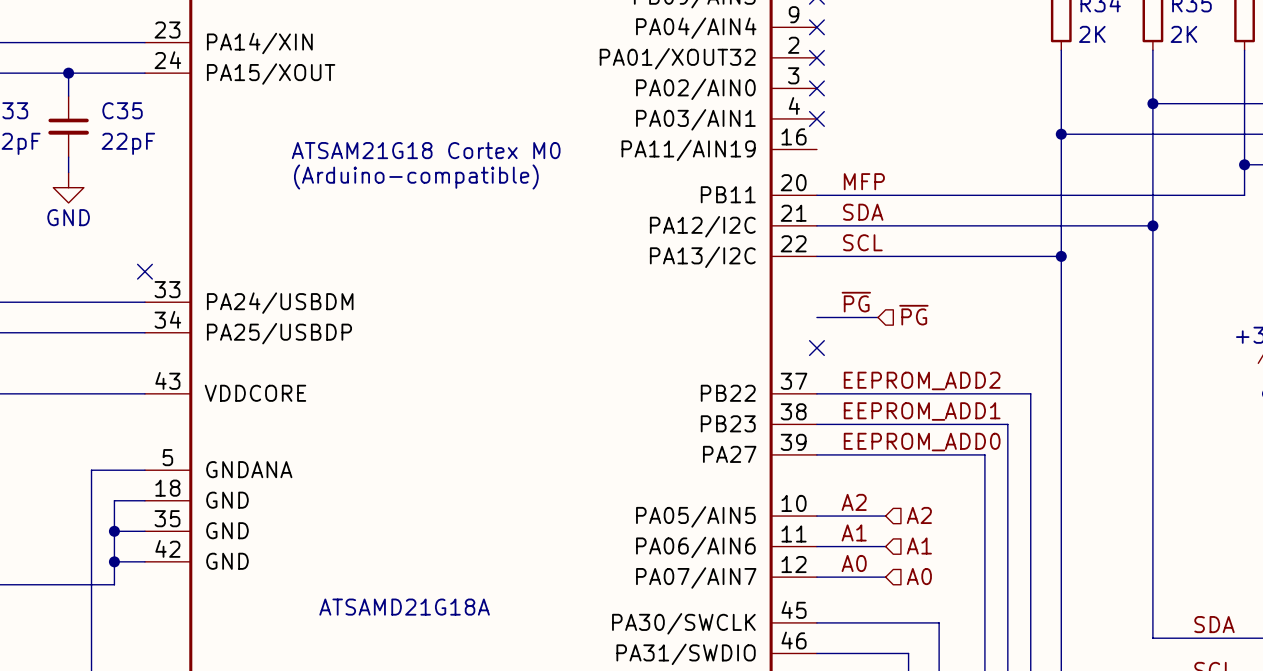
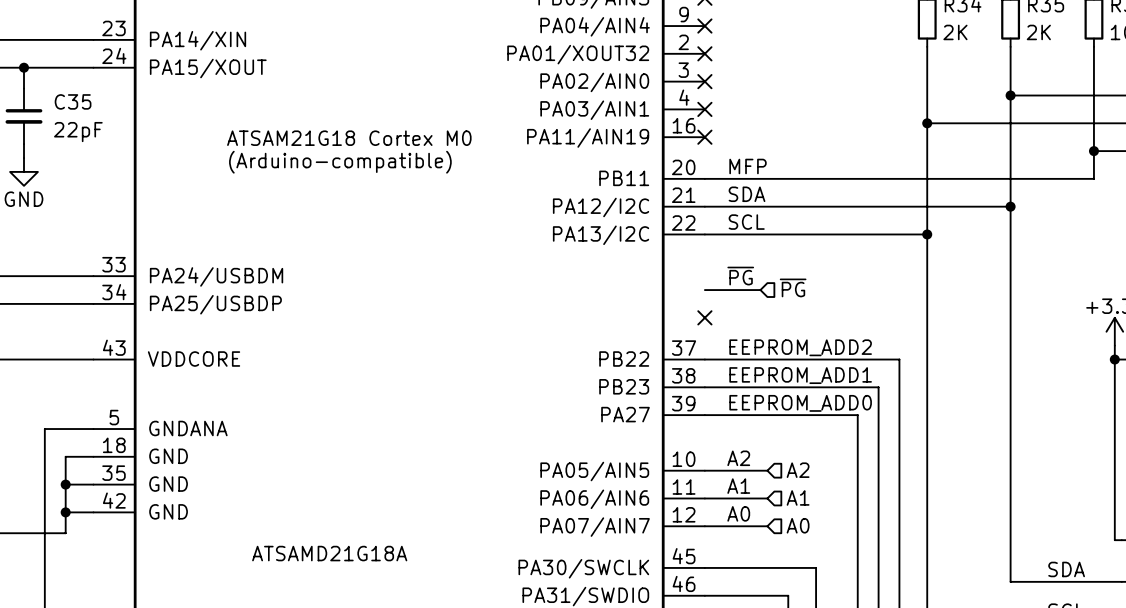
no-connect mark: none -> (704, 137)
no-connect mark: (144, 271) -> none

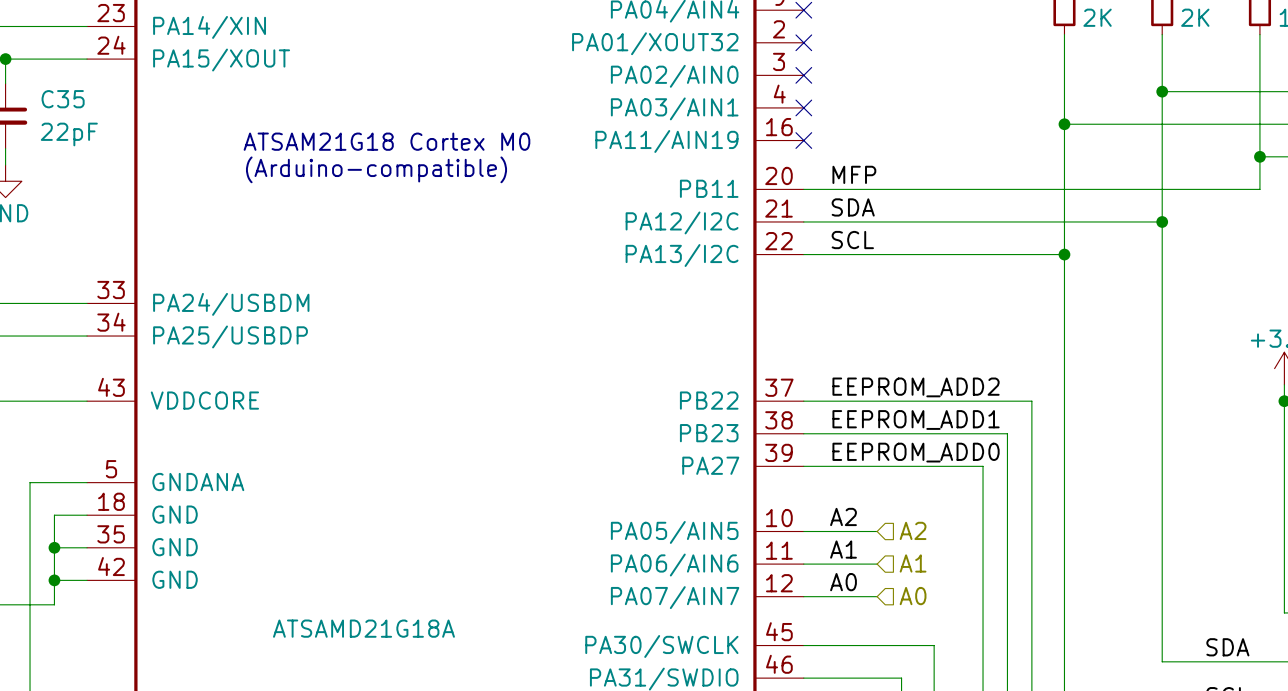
label: ~{PG} (740, 276) -> none
hierarchical label: ~{PG} (793, 287) -> none
wire: (704, 290) (760, 290) -> none
no-connect mark: (704, 317) -> none

